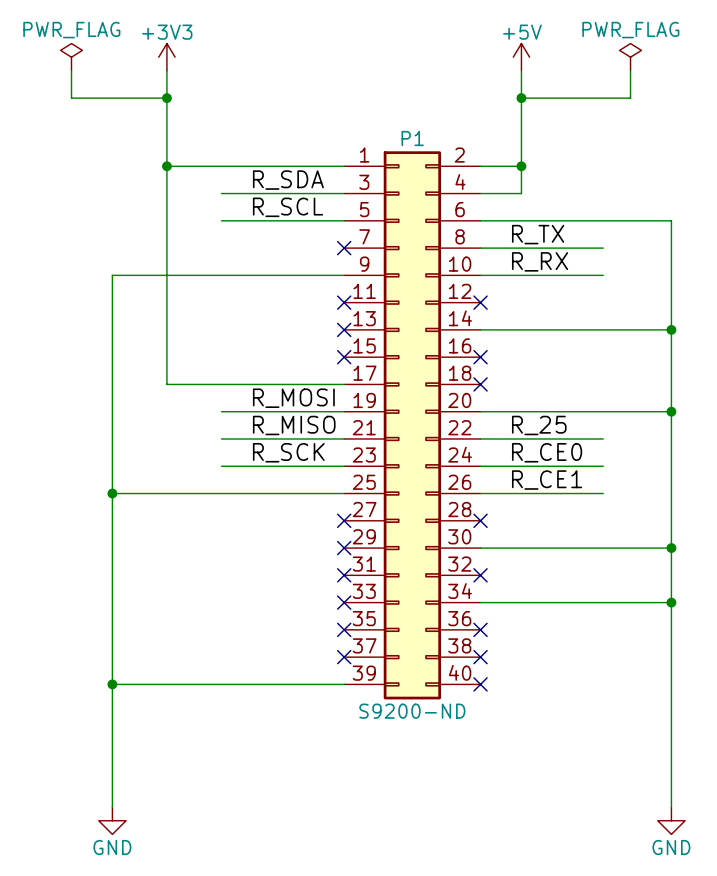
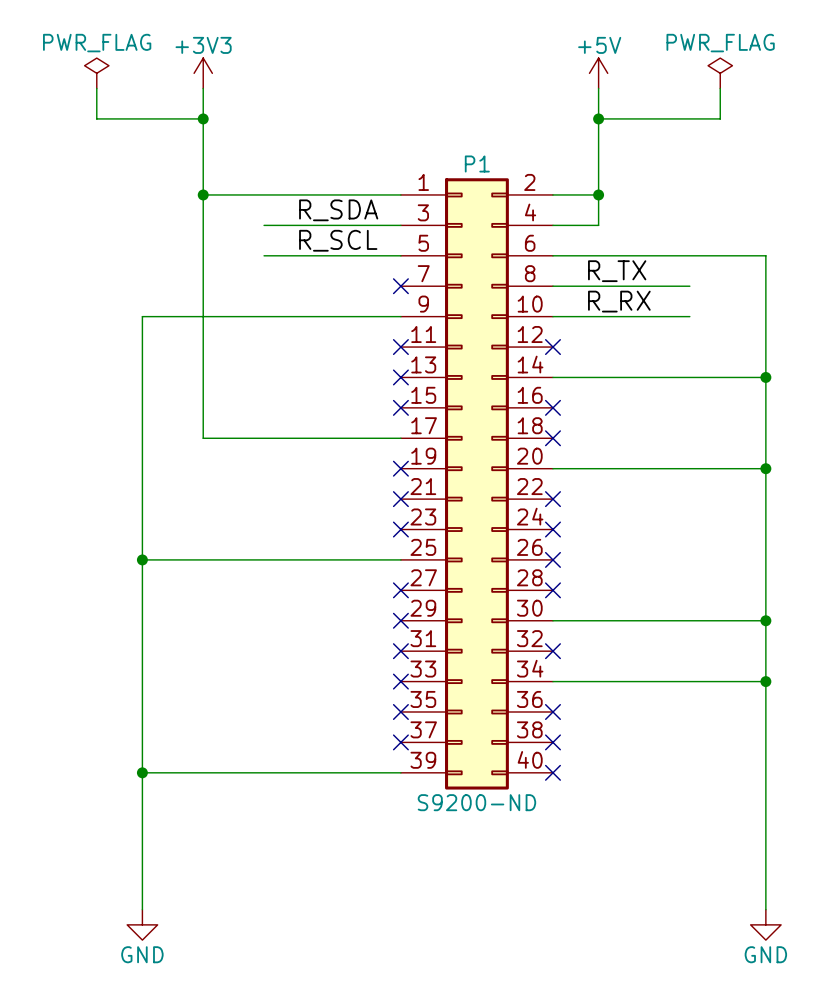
label: R_MOSI (293, 398) -> none
wire: (221, 411) (344, 411) -> none
no-connect mark: none -> (400, 468)
label: R_MISO (294, 425) -> none
label: R_25 (539, 425) -> none
wire: (221, 438) (344, 438) -> none
no-connect mark: none -> (400, 499)
wire: (480, 438) (603, 438) -> none
no-connect mark: none -> (552, 499)
label: R_SCK (288, 452) -> none
label: R_CE0 (547, 452) -> none
wire: (221, 466) (344, 466) -> none
no-connect mark: none -> (400, 529)
wire: (480, 466) (603, 466) -> none
no-connect mark: none -> (552, 529)
label: R_CE1 (547, 480) -> none
wire: (480, 493) (603, 493) -> none
no-connect mark: none -> (552, 559)

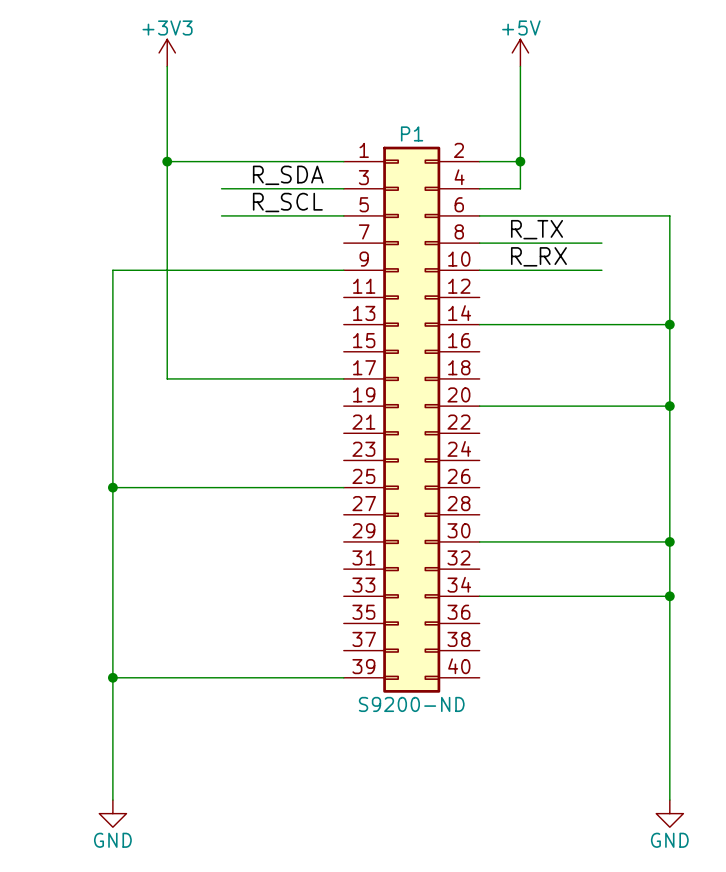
power symbol: PWR_FLAG (96, 73) -> none
power symbol: PWR_FLAG (720, 73) -> none
wire: (96, 88) (96, 118) (203, 118) -> none
wire: (720, 88) (720, 118) (598, 118) -> none
junction: (203, 118) -> none
junction: (598, 118) -> none
no-connect mark: (400, 286) -> none
no-connect mark: (400, 347) -> none
no-connect mark: (552, 347) -> none
no-connect mark: (400, 377) -> none
no-connect mark: (400, 407) -> none
no-connect mark: (552, 407) -> none
no-connect mark: (552, 438) -> none
no-connect mark: (400, 468) -> none
no-connect mark: (400, 499) -> none
no-connect mark: (552, 499) -> none
no-connect mark: (400, 529) -> none
no-connect mark: (552, 529) -> none
no-connect mark: (552, 559) -> none
no-connect mark: (400, 590) -> none
no-connect mark: (552, 590) -> none
no-connect mark: (400, 620) -> none
no-connect mark: (400, 651) -> none
no-connect mark: (552, 651) -> none
no-connect mark: (400, 681) -> none
no-connect mark: (400, 712) -> none
no-connect mark: (552, 712) -> none
no-connect mark: (400, 742) -> none
no-connect mark: (552, 742) -> none
no-connect mark: (552, 772) -> none

